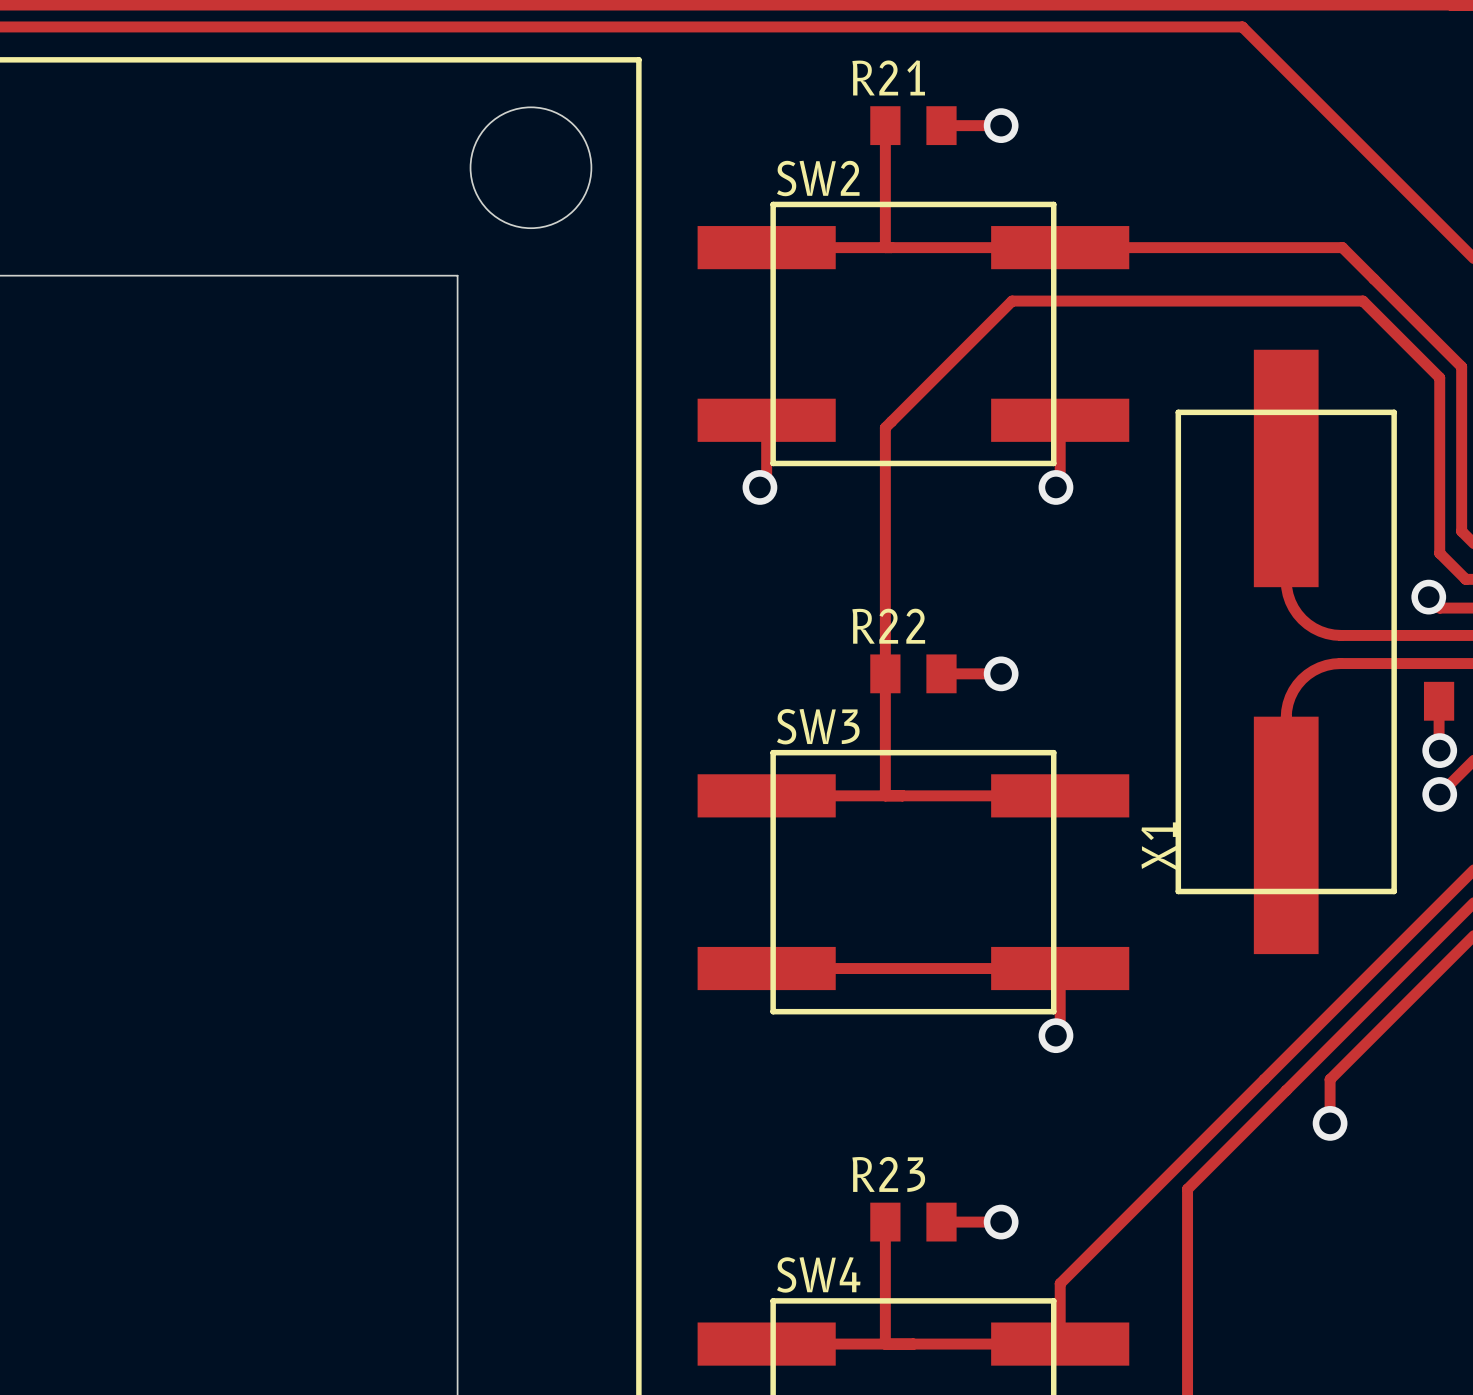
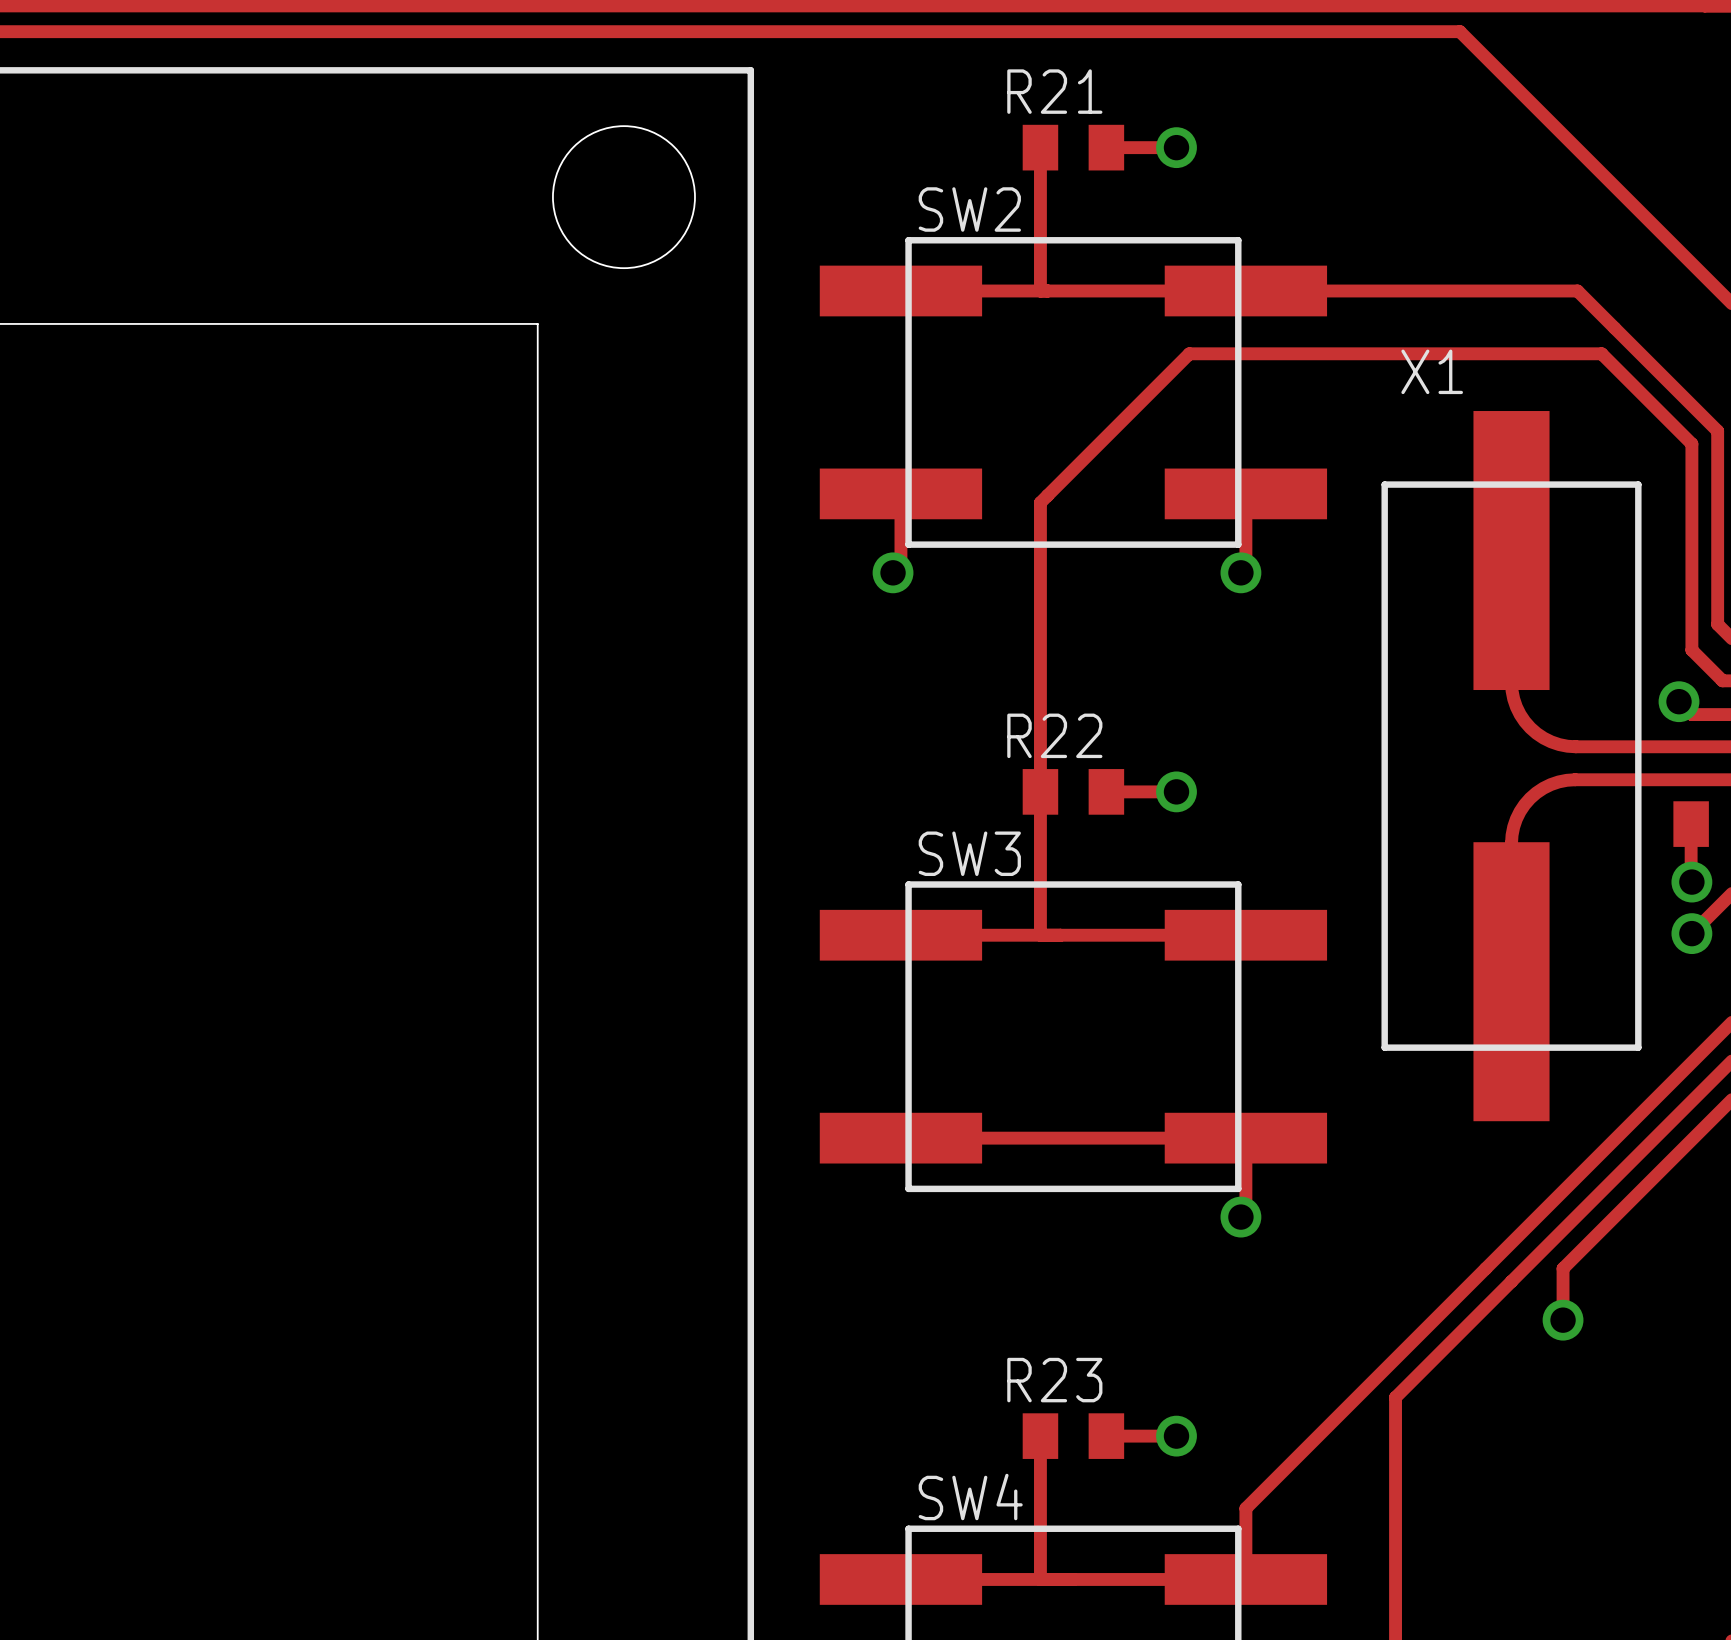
X1 name rotation: 0° (1159, 846) -> 90° clockwise (1432, 371)
X1 name position: X1 (1159, 846) -> X1 (1432, 371)

